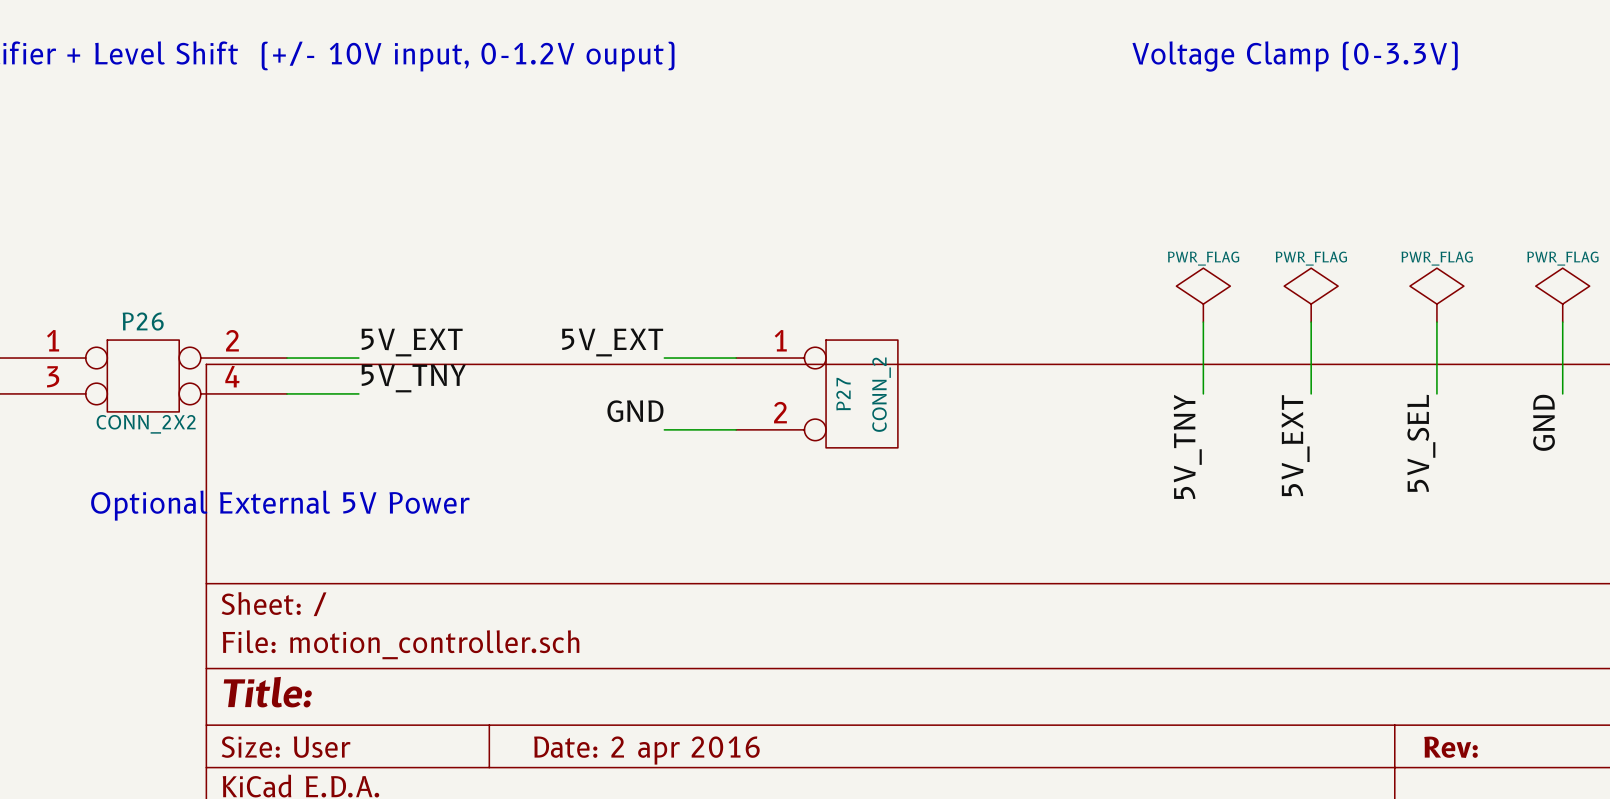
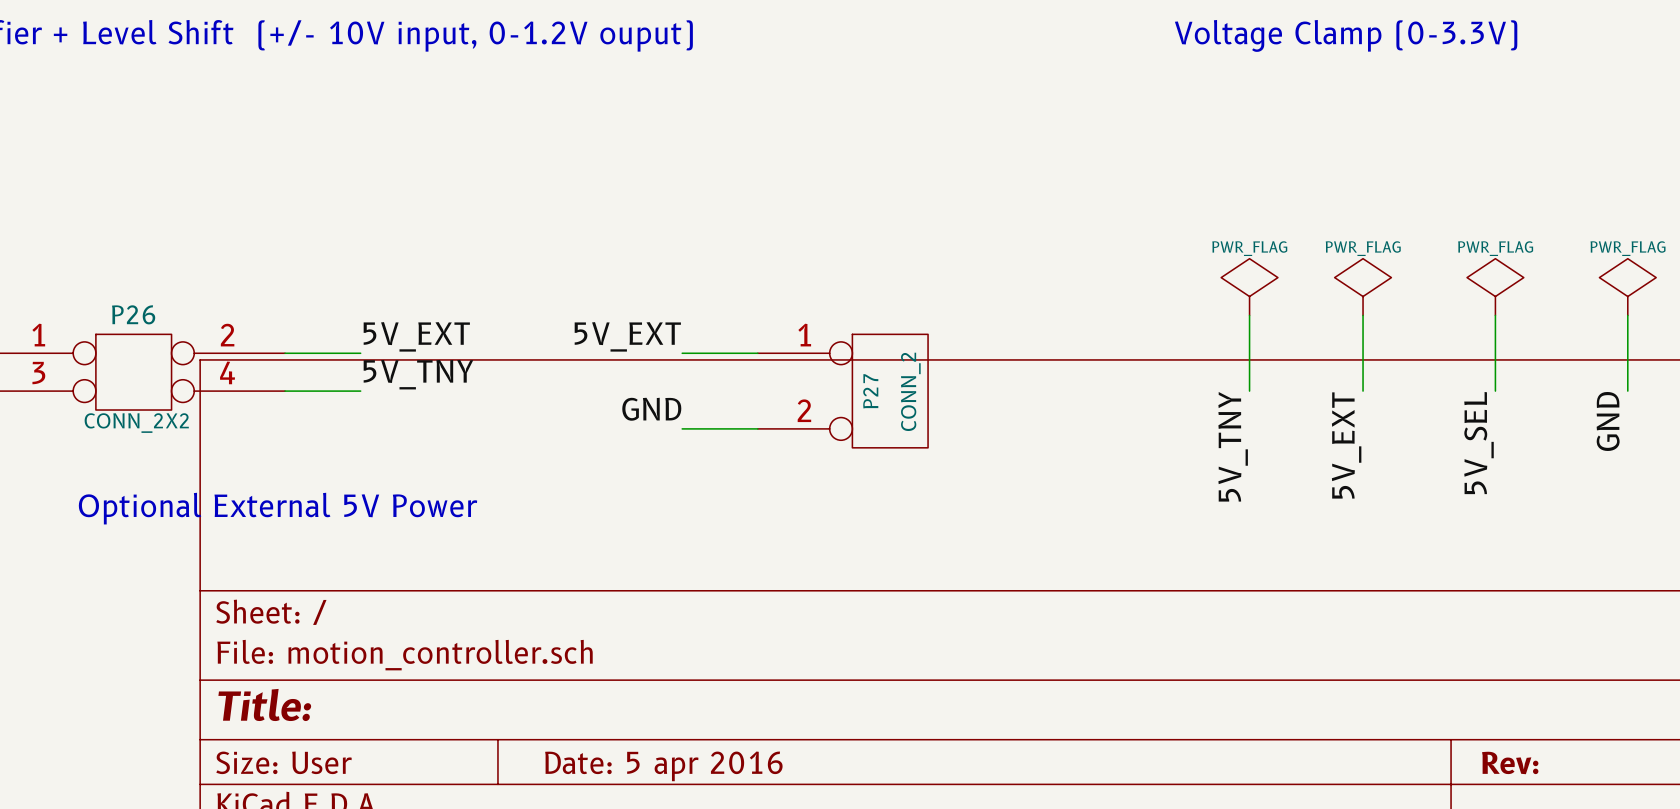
title block: Date: 2 apr 2016 (646, 750) -> Date: 5 apr 2016 (663, 766)

